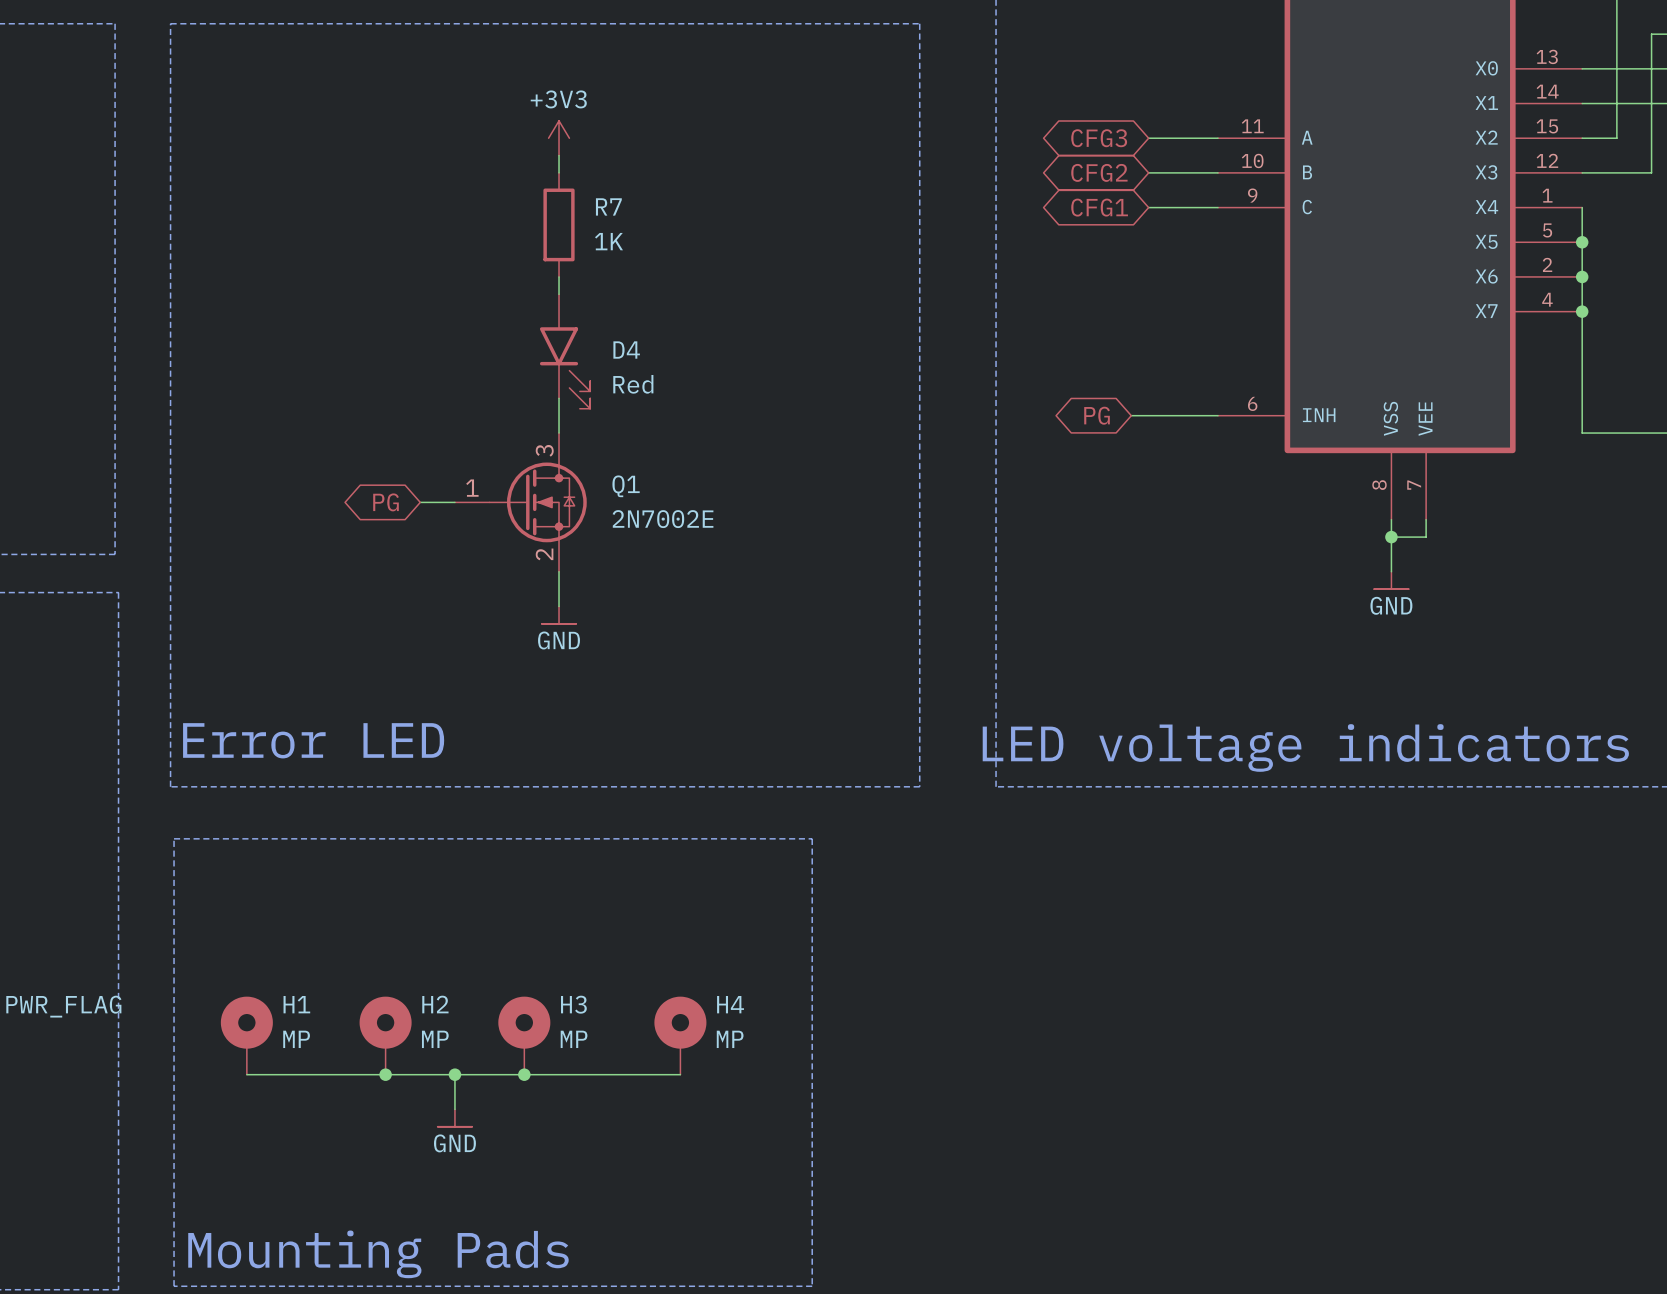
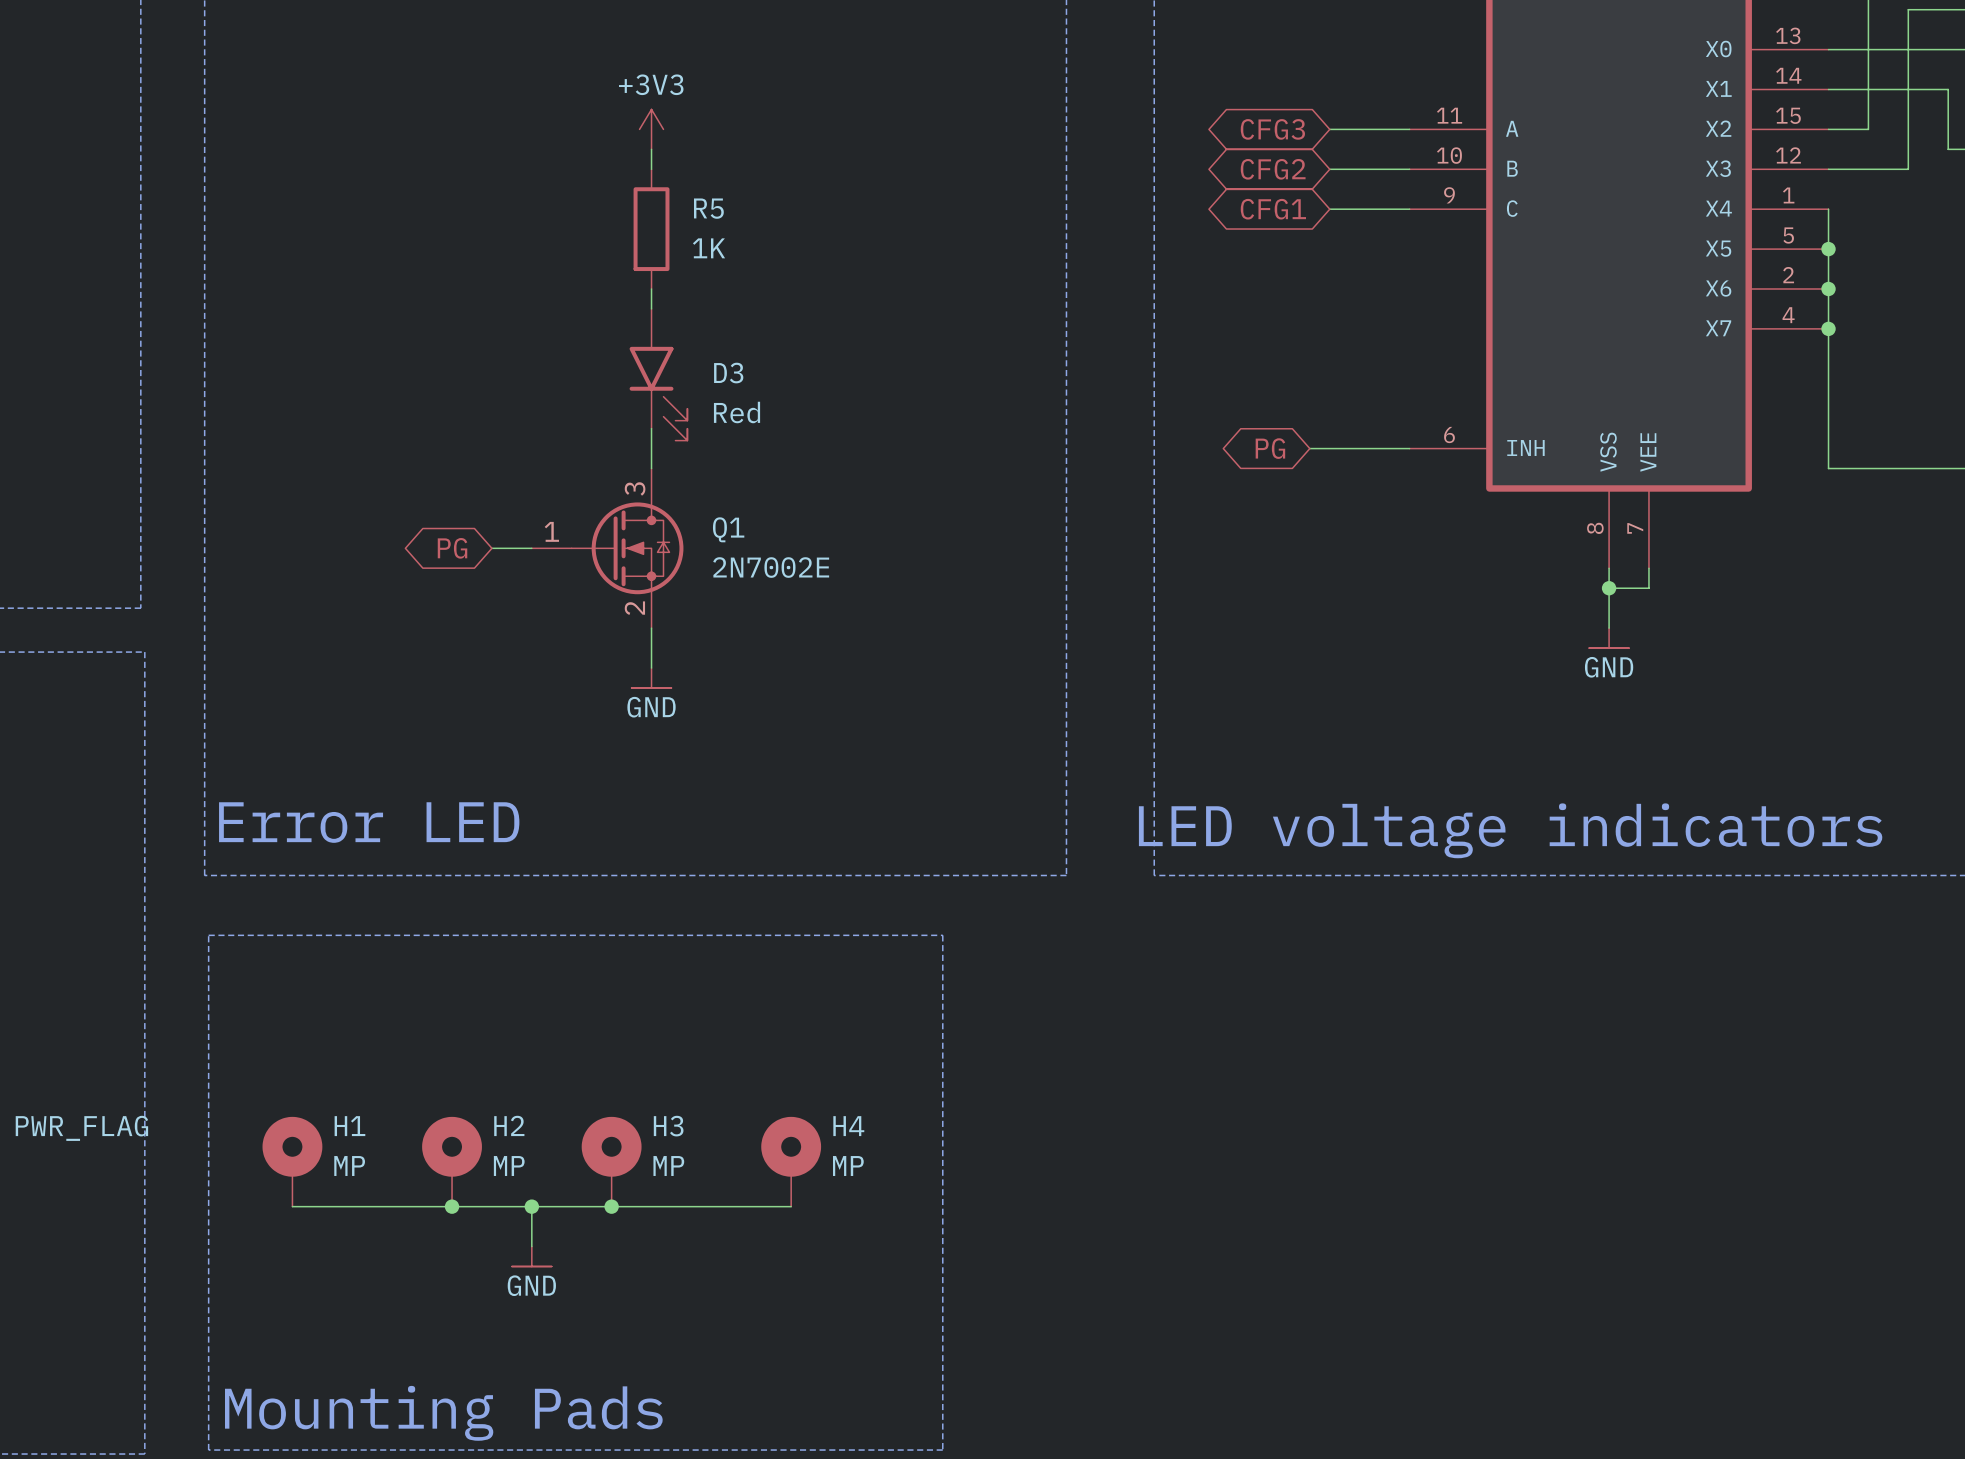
R7 name: R7 (608, 206) -> R5 (708, 208)
D4 name: D4 (626, 350) -> D3 (728, 373)

